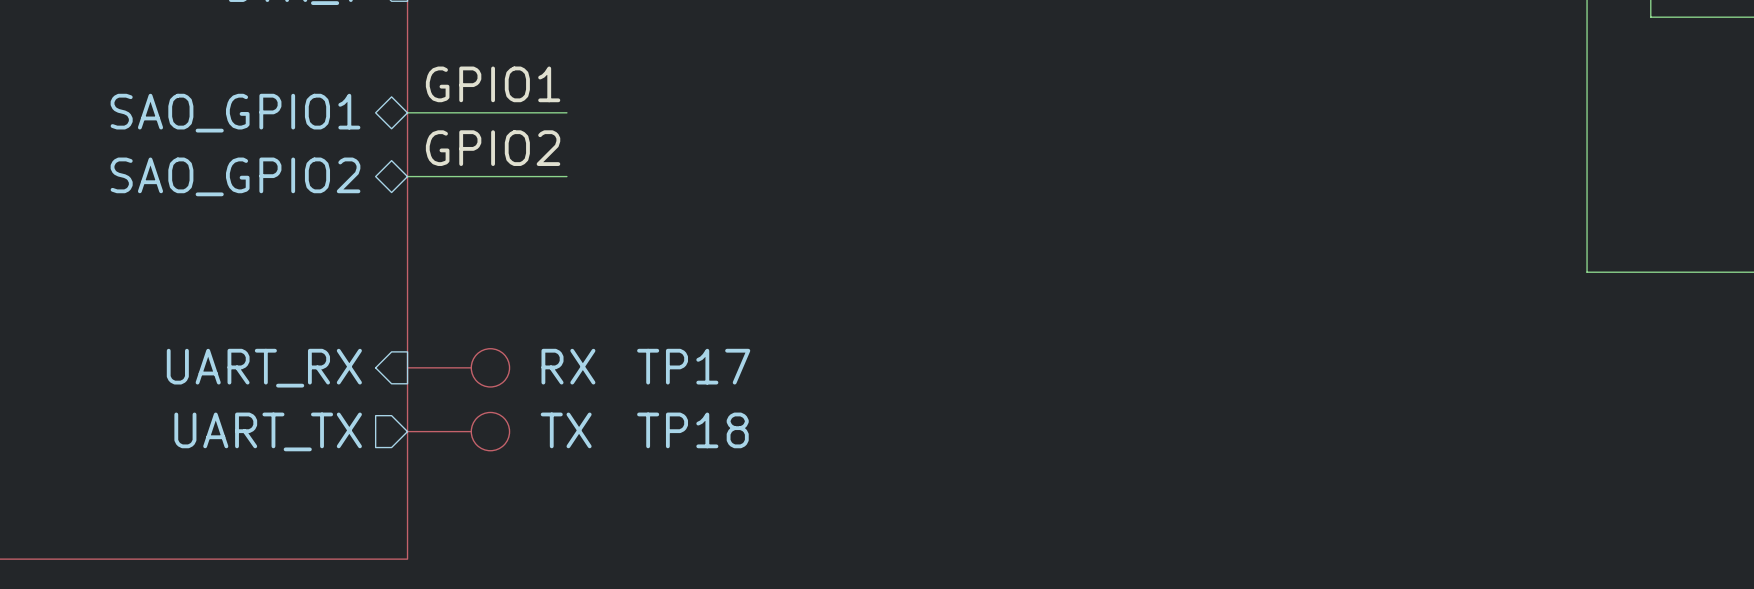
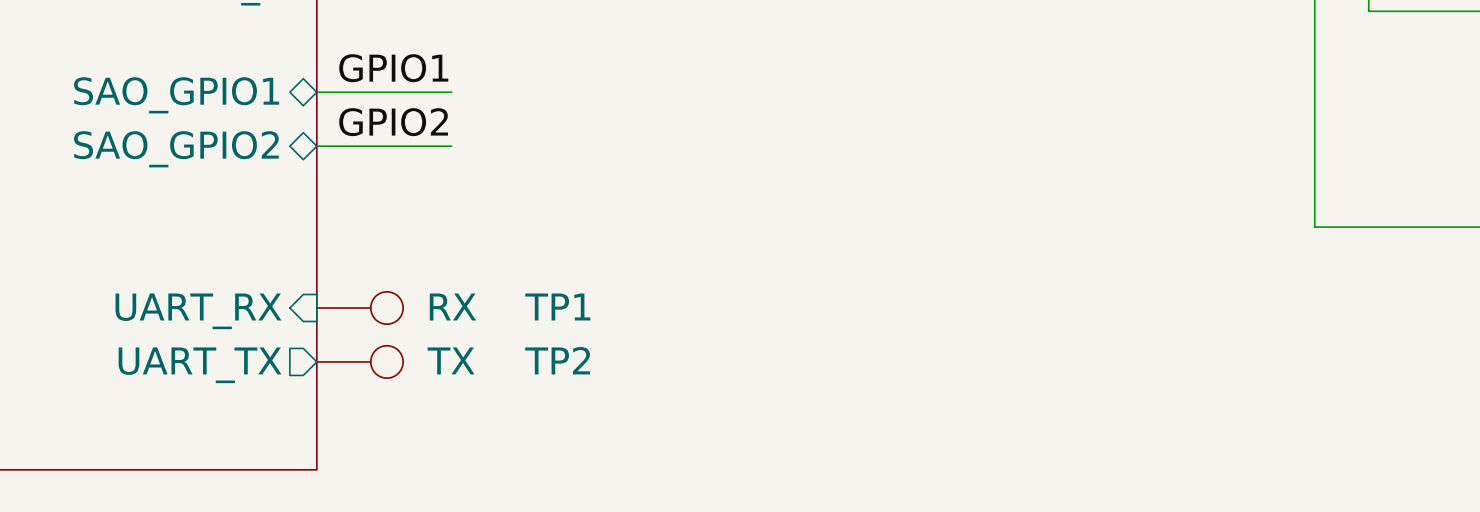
TP17 name: TP17 (693, 366) -> TP1 (557, 306)
TP18 name: TP18 (692, 430) -> TP2 (557, 360)

